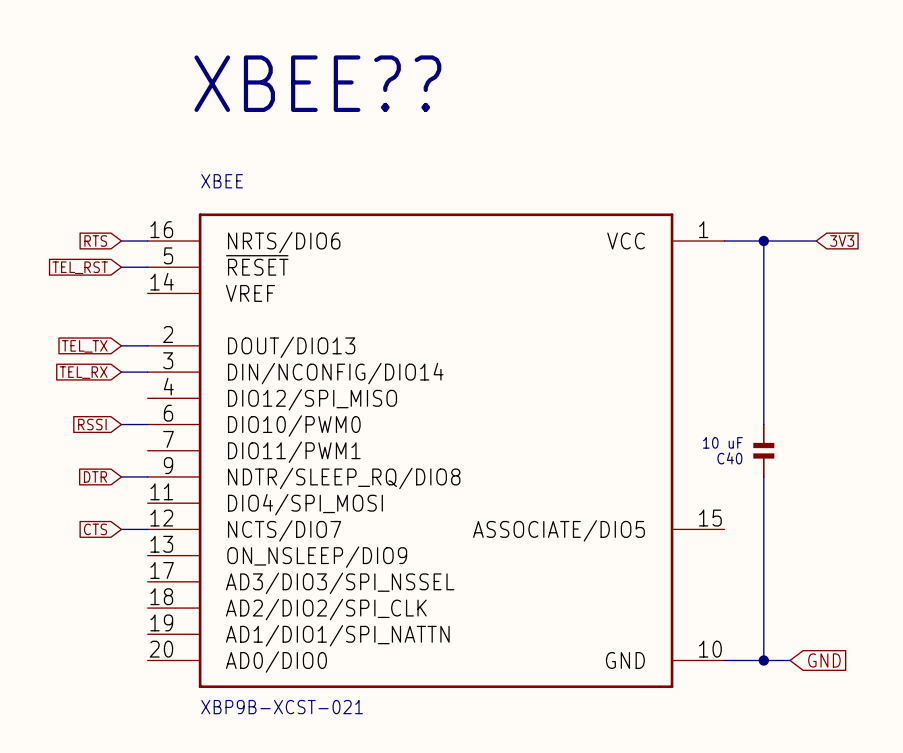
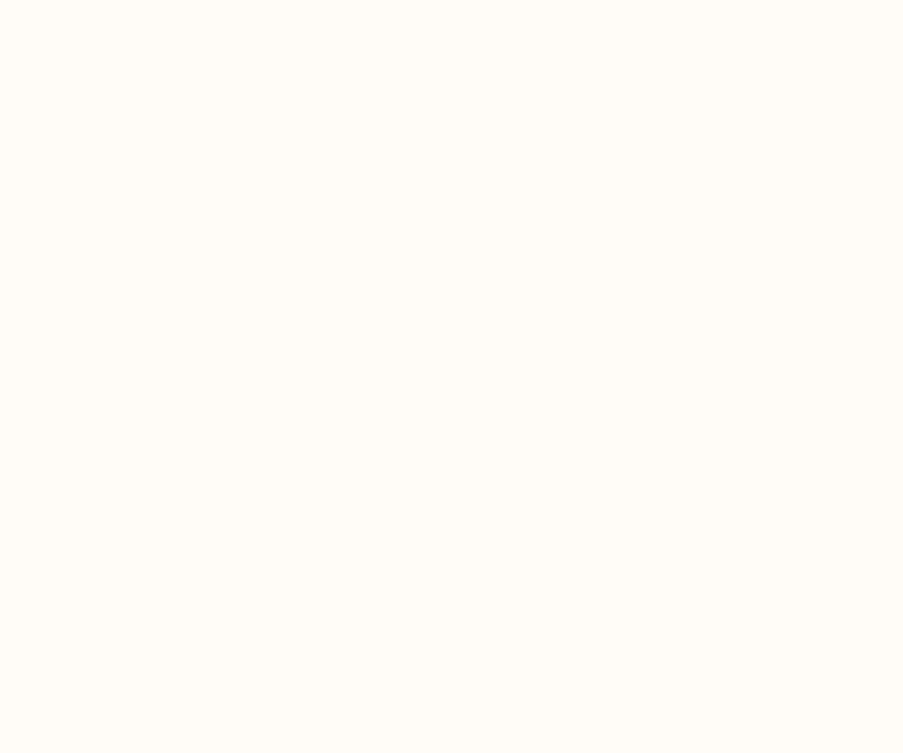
text: XBEE?? (317, 83) -> none
global label: RTS (95, 241) -> none
wire: (121, 241) (147, 241) -> none
wire: (724, 241) (816, 241) -> none
wire: (763, 241) (763, 424) -> none
junction: (763, 241) -> none
global label: 3V3 (842, 241) -> none
global label: TEL_RST (80, 267) -> none
wire: (121, 267) (147, 267) -> none
wire: (121, 345) (147, 345) -> none
global label: TEL_TX (84, 346) -> none
global label: TEL_RX (83, 372) -> none
wire: (121, 372) (147, 372) -> none
global label: RSSI (92, 424) -> none
wire: (121, 424) (147, 424) -> none
XBEE: XBP9B-XCST-021 (436, 450) -> none
C40: 10 uF (763, 450) -> none
global label: DTR (95, 476) -> none
wire: (121, 476) (147, 476) -> none
wire: (763, 476) (763, 660) -> none
global label: CTS (95, 529) -> none
wire: (121, 529) (147, 529) -> none
wire: (724, 660) (790, 660) -> none
junction: (763, 660) -> none
global label: GND (824, 660) -> none

